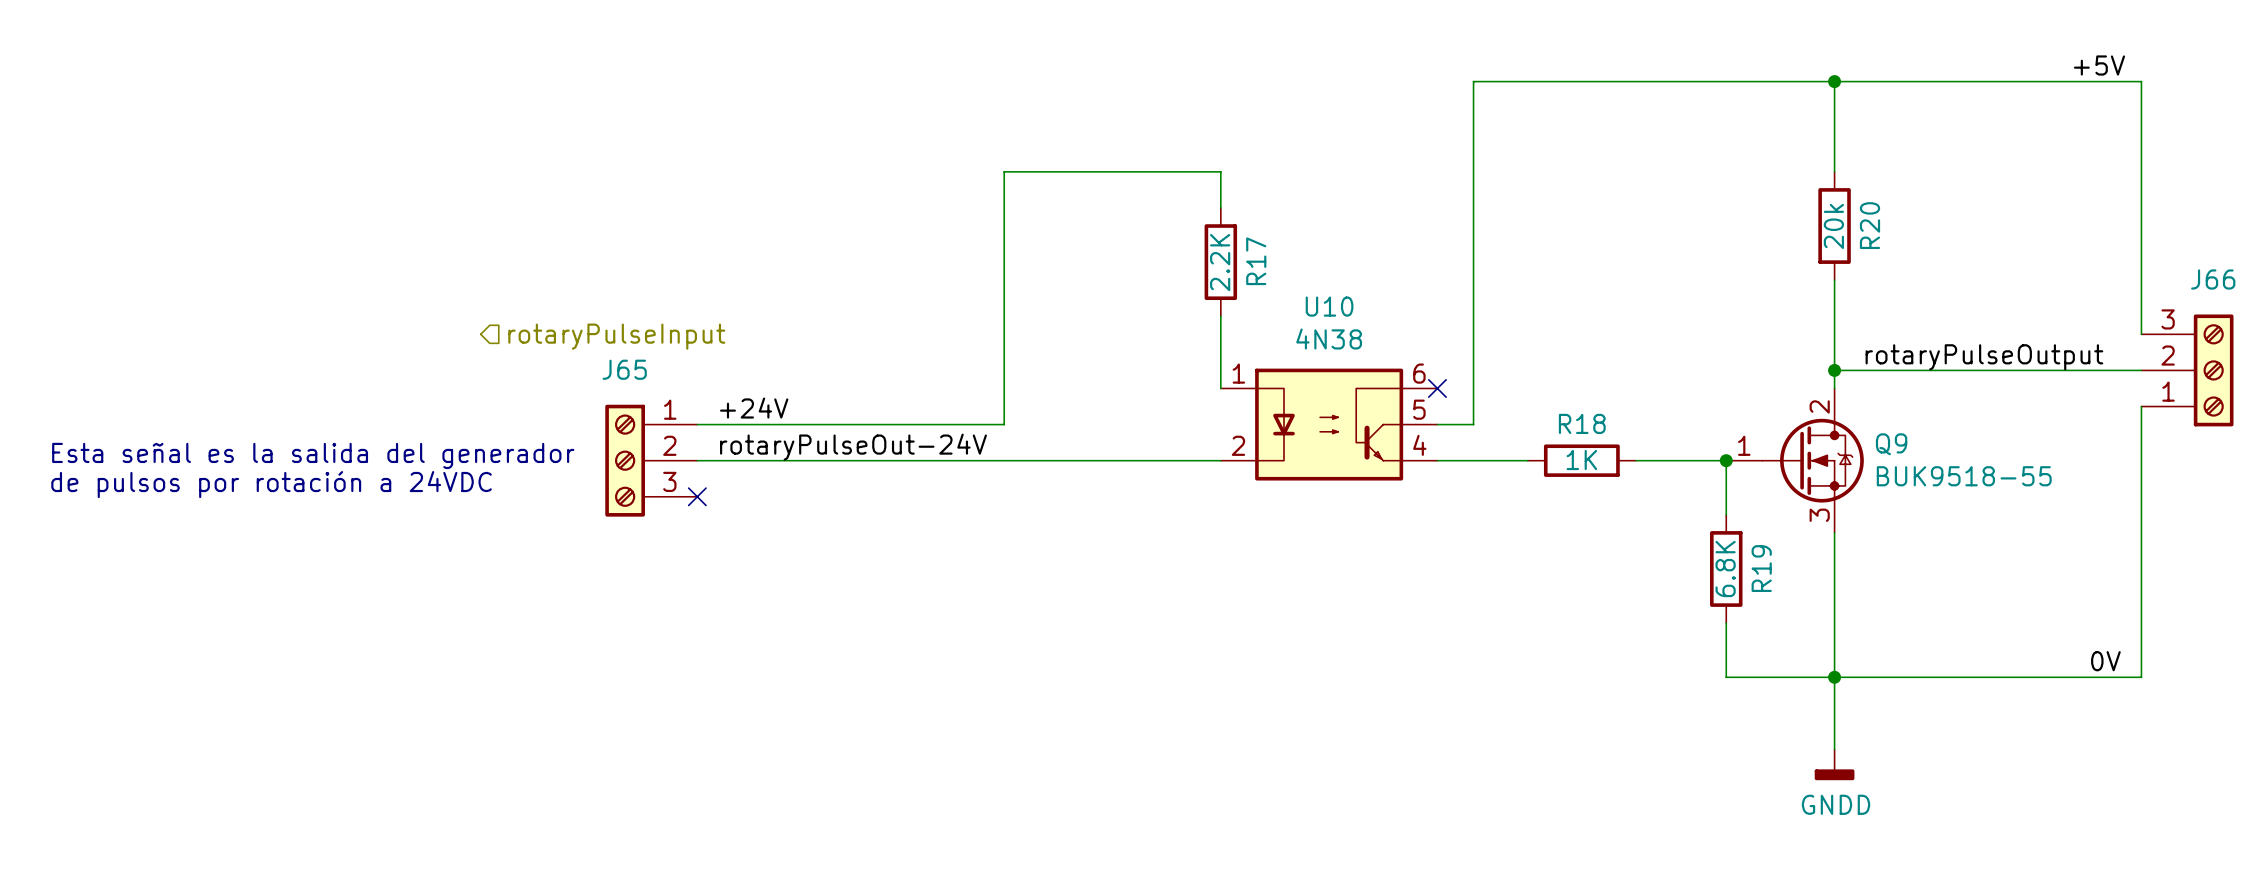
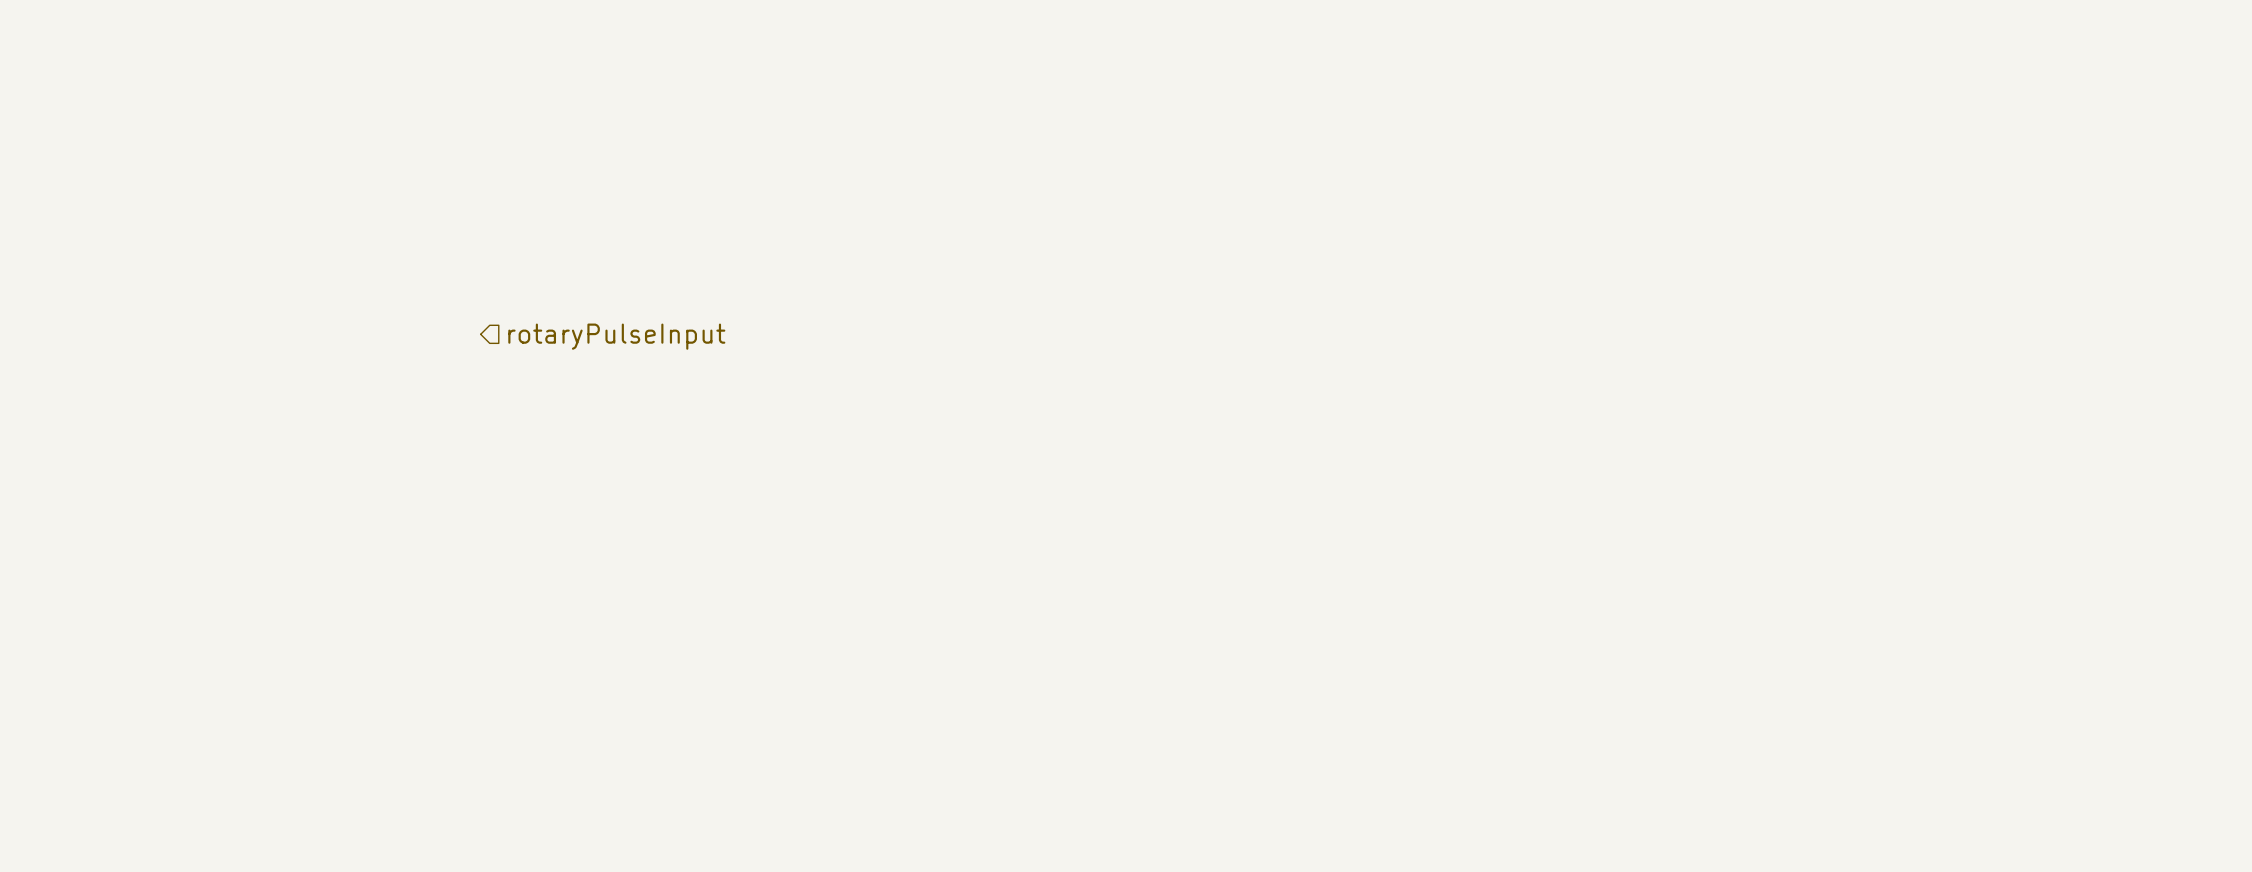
label: +5V (2099, 65) -> none
wire: (1834, 81) (1834, 171) -> none
junction: (1834, 81) -> none
wire: (1220, 207) (1220, 171) (1004, 171) (1004, 424) (697, 424) -> none
R20: 20k (1834, 226) -> none
R17: 2.2K (1220, 262) -> none
wire: (1834, 280) (1834, 388) -> none
wire: (1220, 316) (1220, 388) -> none
wire: (2141, 334) (2141, 81) (1473, 81) (1473, 424) (1437, 424) -> none
label: rotaryPulseOutput (1984, 357) -> none
wire: (1834, 370) (2141, 370) -> none
junction: (1834, 370) -> none
J66: (2187, 370) -> none
no-connect mark: (1437, 388) -> none
wire: (2141, 406) (2141, 677) (1726, 677) (1726, 623) -> none
label: +24V (754, 408) -> none
U10: 4N38 (1329, 424) -> none
label: rotaryPulseOut-24V (853, 447) -> none
text: Esta señal es la salida del generador (313, 455) -> none
J65: (651, 460) -> none
wire: (697, 460) (1220, 460) -> none
wire: (1437, 460) (1527, 460) -> none
R18: 1K (1581, 460) -> none
wire: (1636, 460) (1726, 460) (1726, 514) -> none
junction: (1726, 460) -> none
Q9: BUK9518-55 (1795, 460) -> none
text: de pulsos por rotación a 24VDC (271, 484) -> none
no-connect mark: (697, 496) -> none
wire: (1834, 532) (1834, 749) -> none
R19: 6.8K (1726, 568) -> none
label: 0V (2105, 661) -> none
junction: (1834, 677) -> none
power symbol: GNDD (1834, 764) -> none

